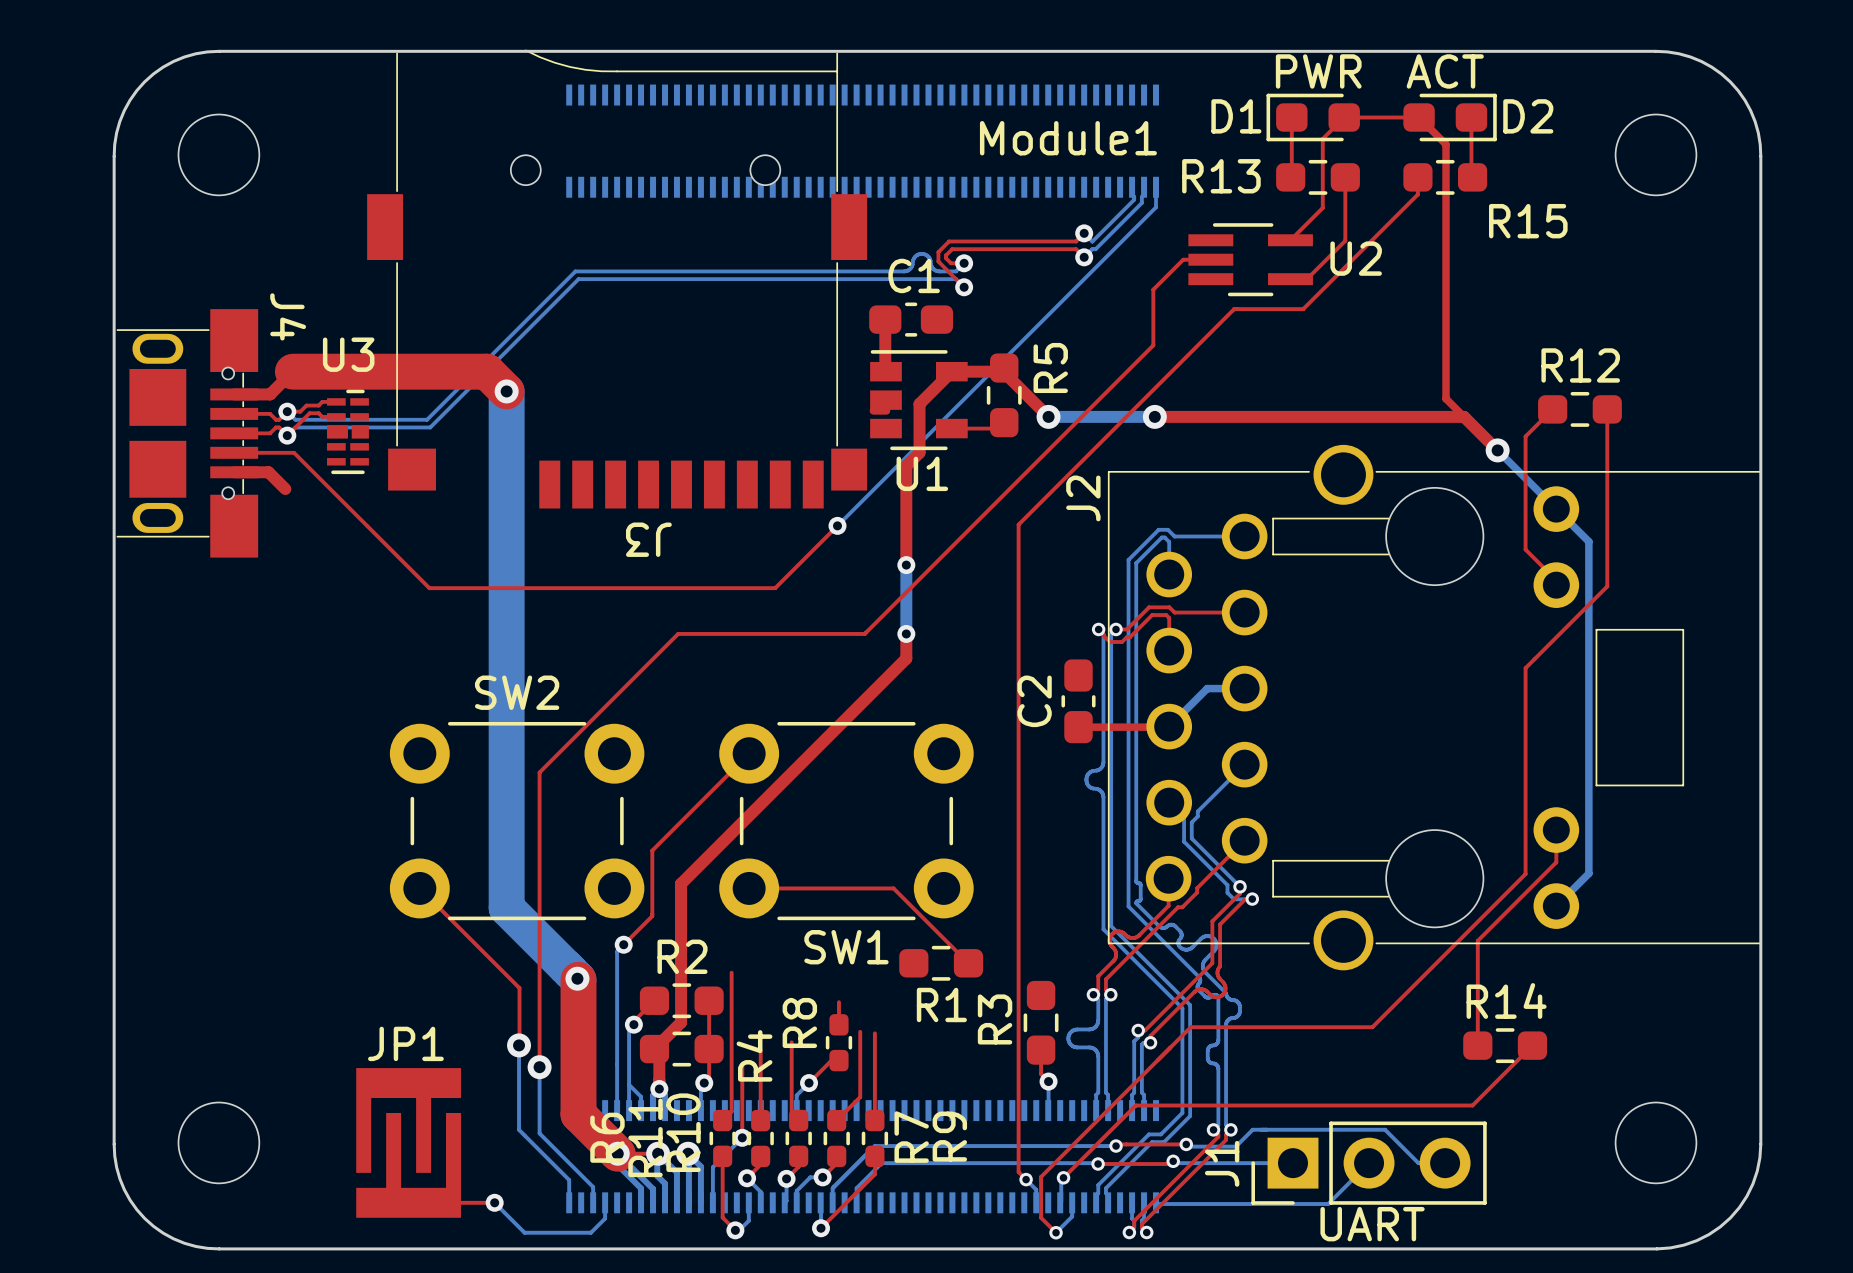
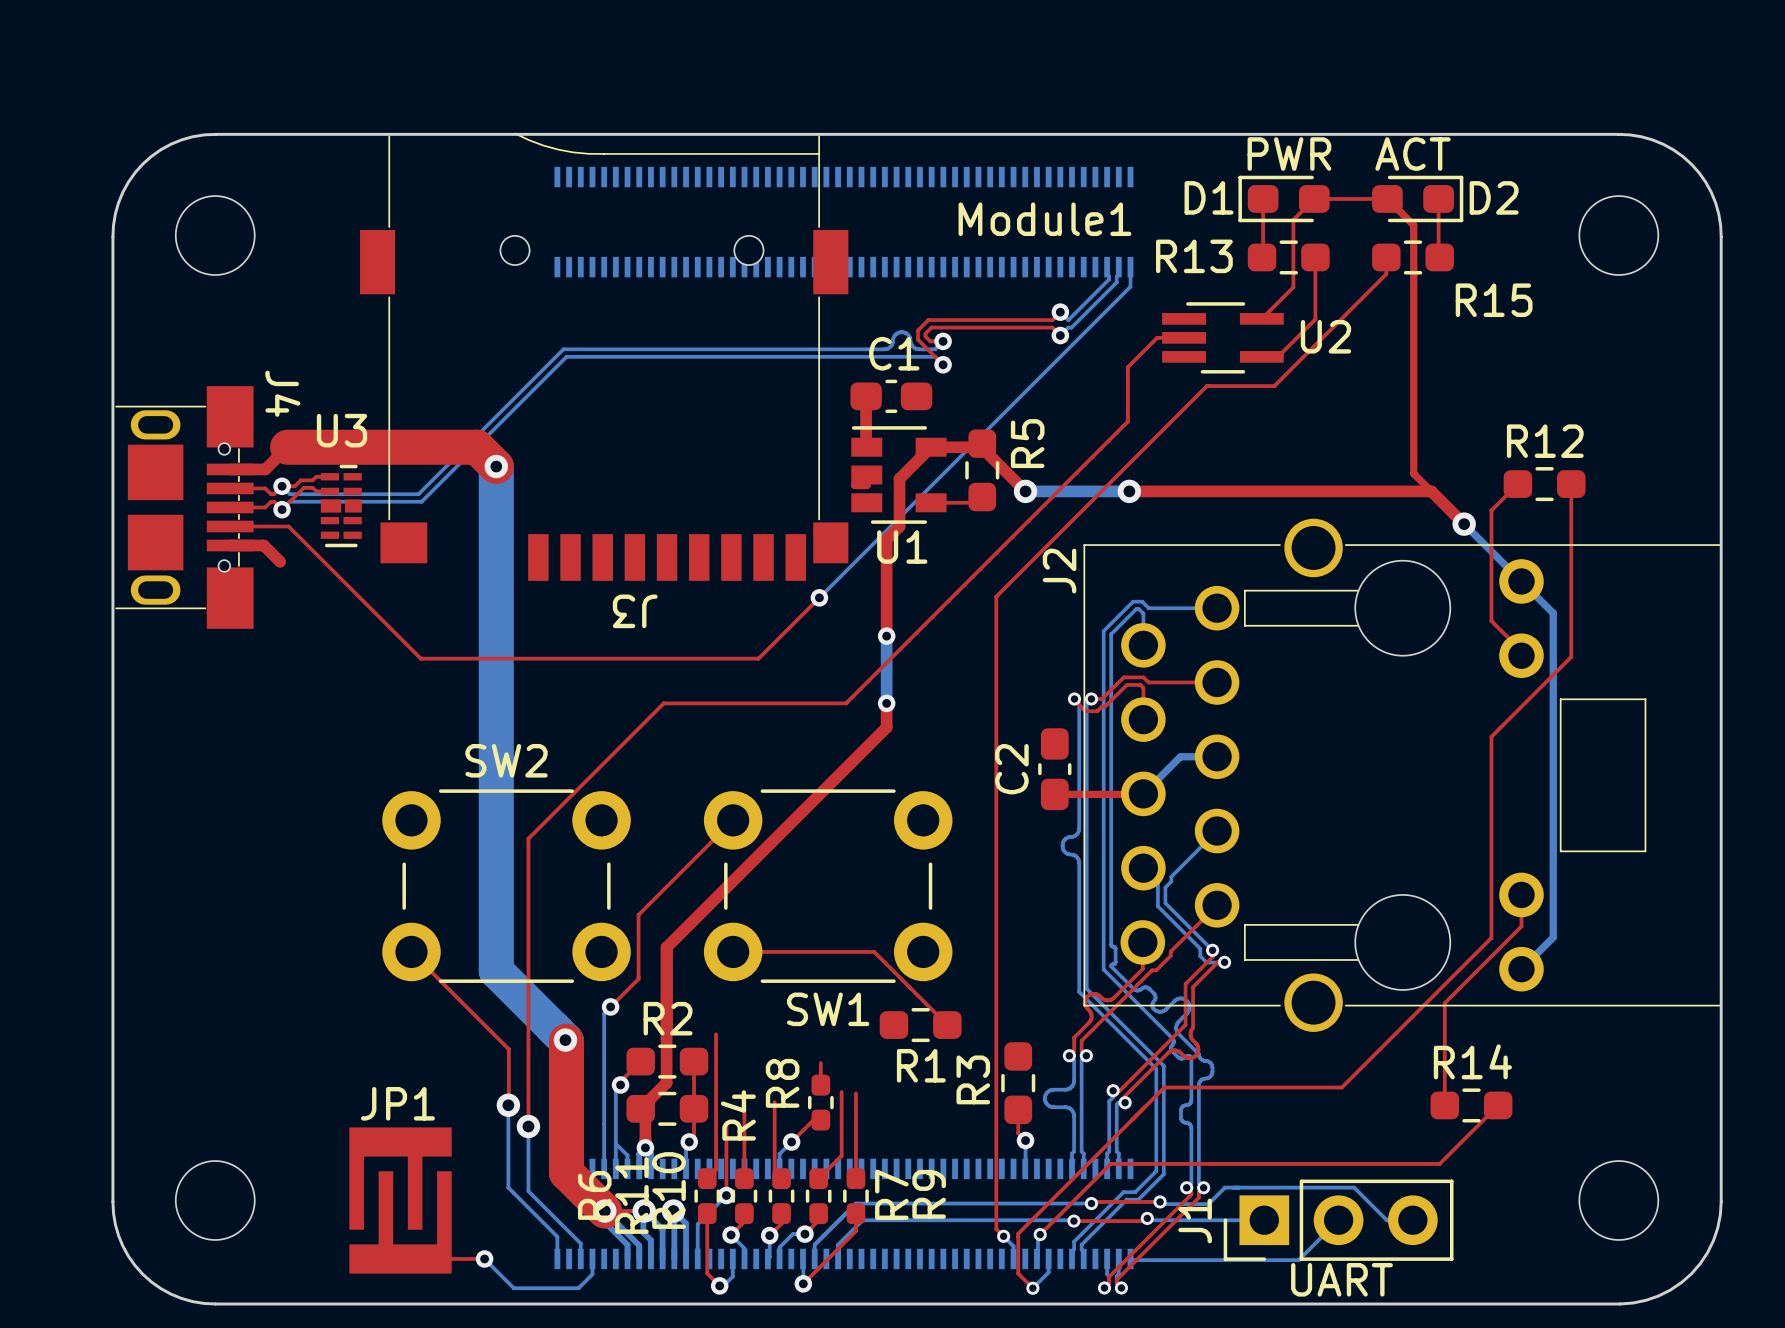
J3 footprint: [367, 49, 868, 509] -> [360, 132, 849, 581]

